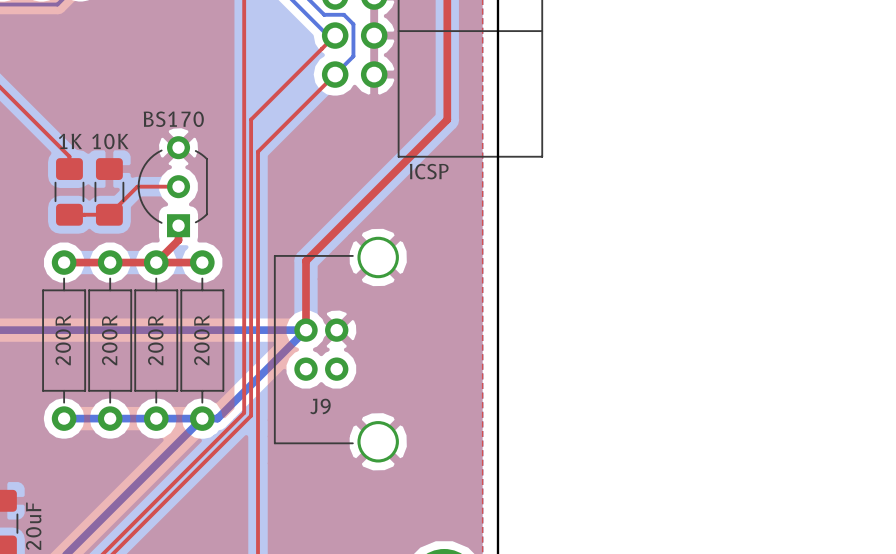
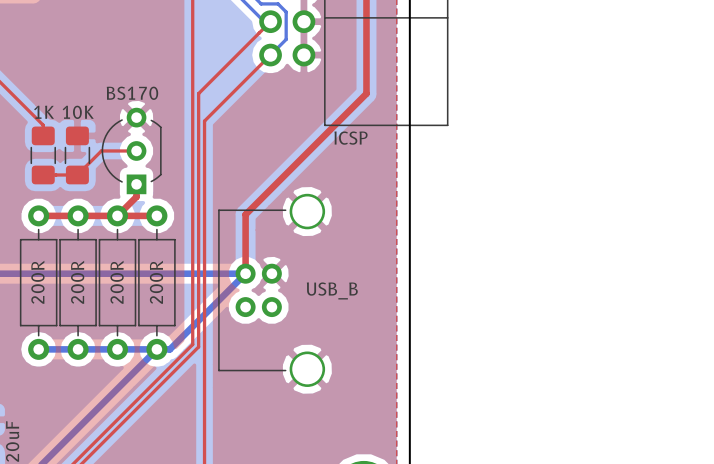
J9 value: none -> USB_B (332, 290)
J9 name: J9 (320, 406) -> none

